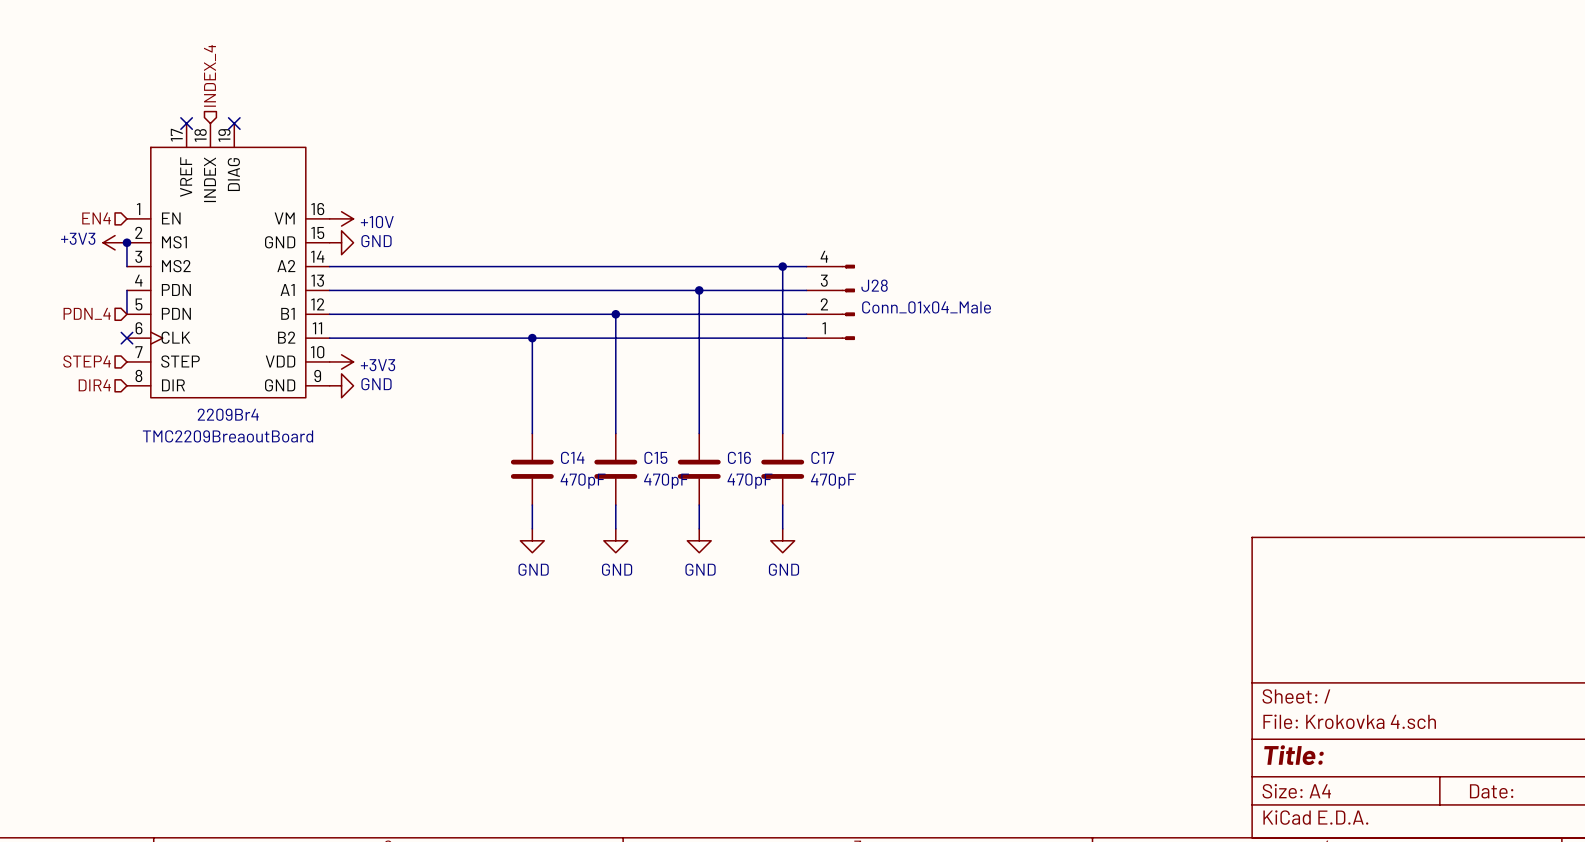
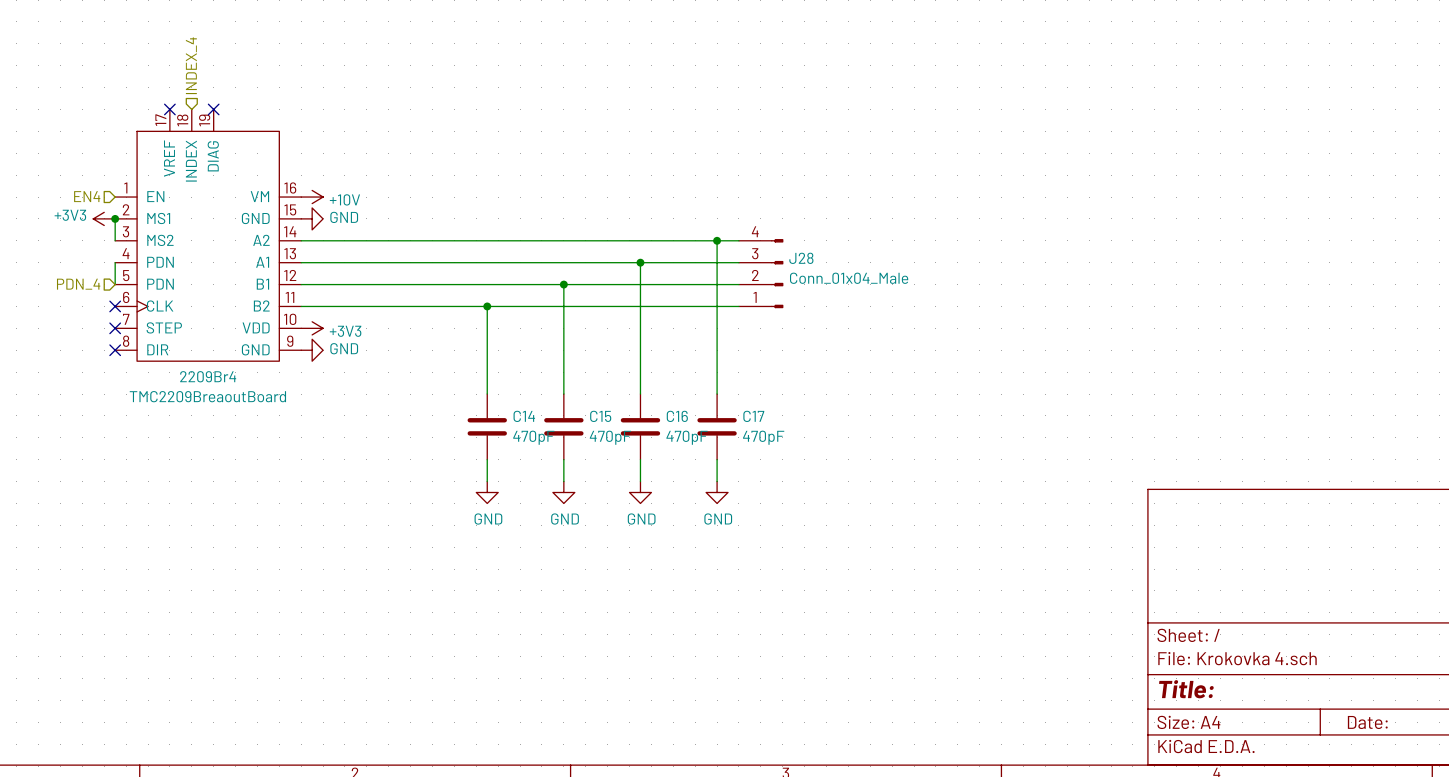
hierarchical label: STEP4 (87, 361) -> none
no-connect mark: none -> (115, 328)
hierarchical label: DIR4 (94, 385) -> none
no-connect mark: none -> (115, 350)

